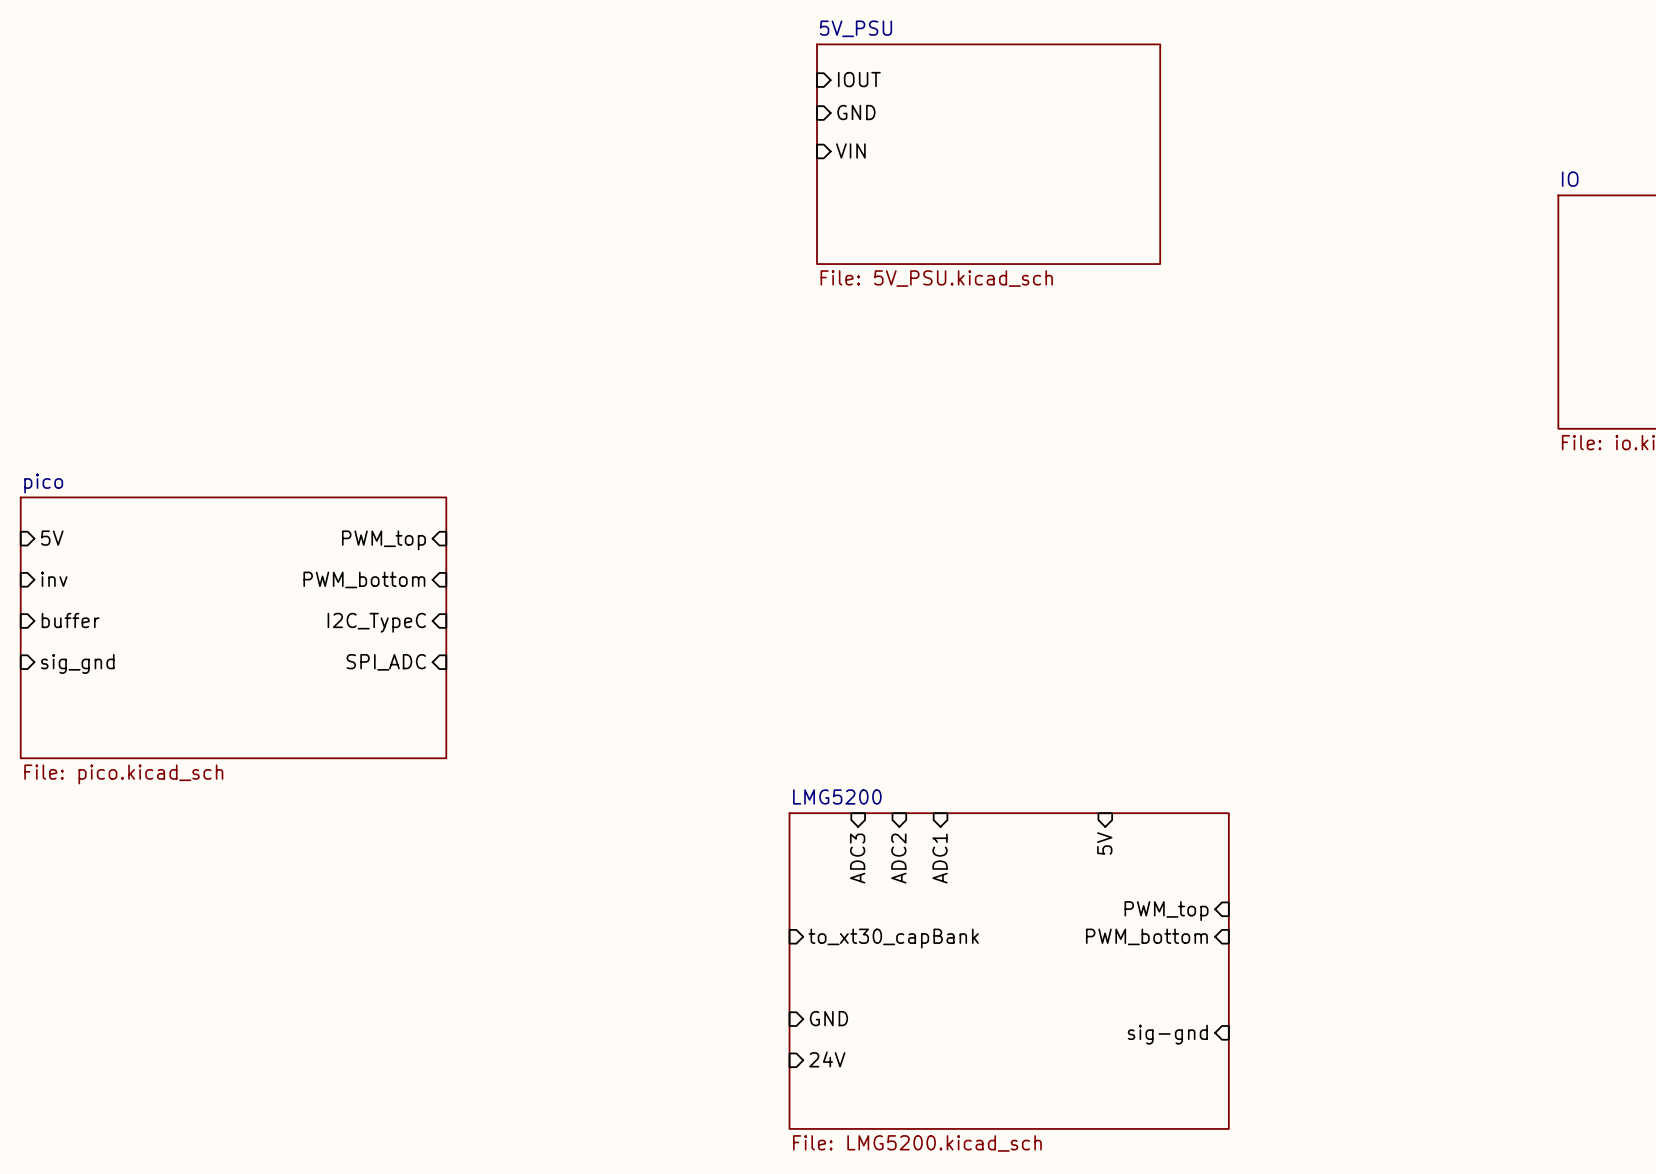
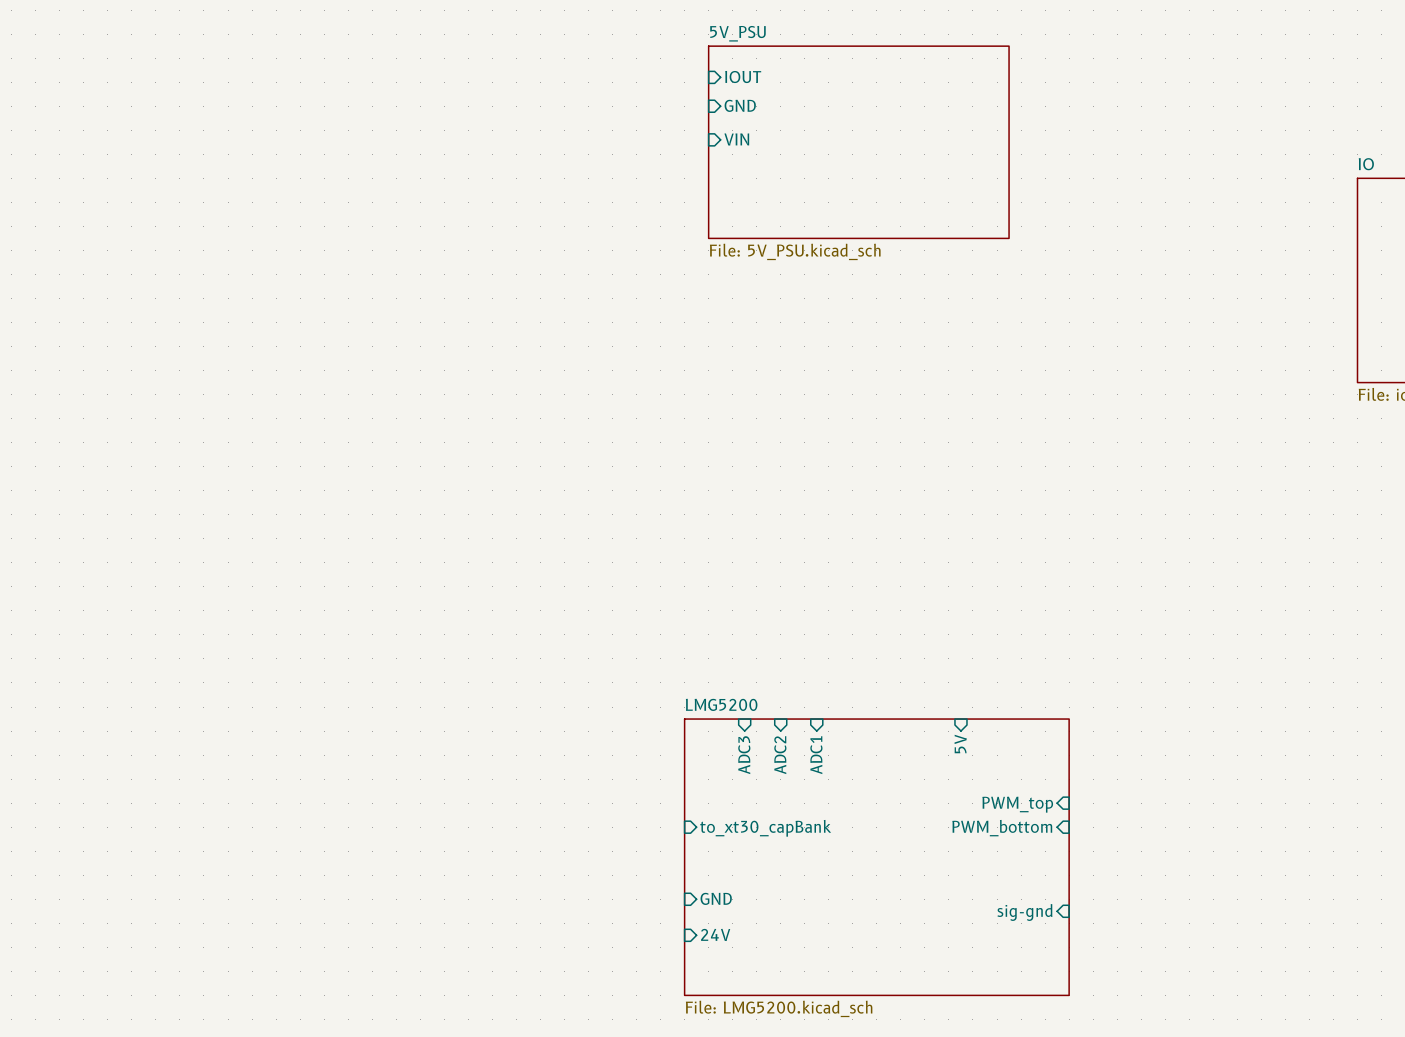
sheet pin: 5V (52, 538) -> none
sheet pin: PWM_top (383, 540) -> none
sheet pin: inv (54, 579) -> none
sheet pin: PWM_bottom (364, 579) -> none
sheet pin: buffer (70, 620) -> none
sheet pin: I2C_TypeC (376, 622) -> none
sheet pico: File: pico.kicad_sch (233, 627) -> none
sheet pin: SPI_ADC (386, 662) -> none
sheet pin: sig_gnd (77, 663) -> none

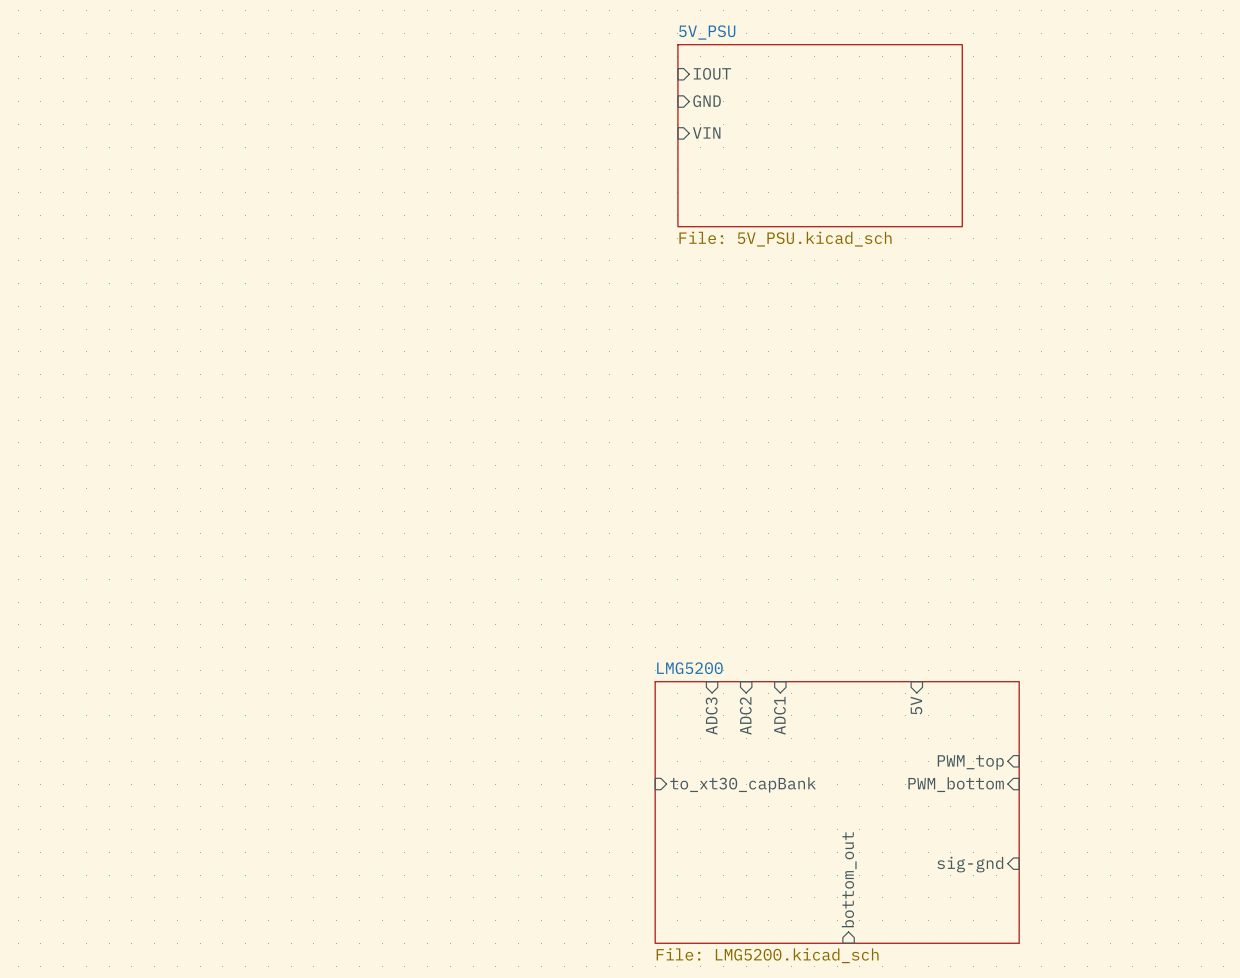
sheet pin: GND (716, 898) -> none
sheet pin: 24V (715, 934) -> none
sheet pin: none -> bottom_out (849, 879)

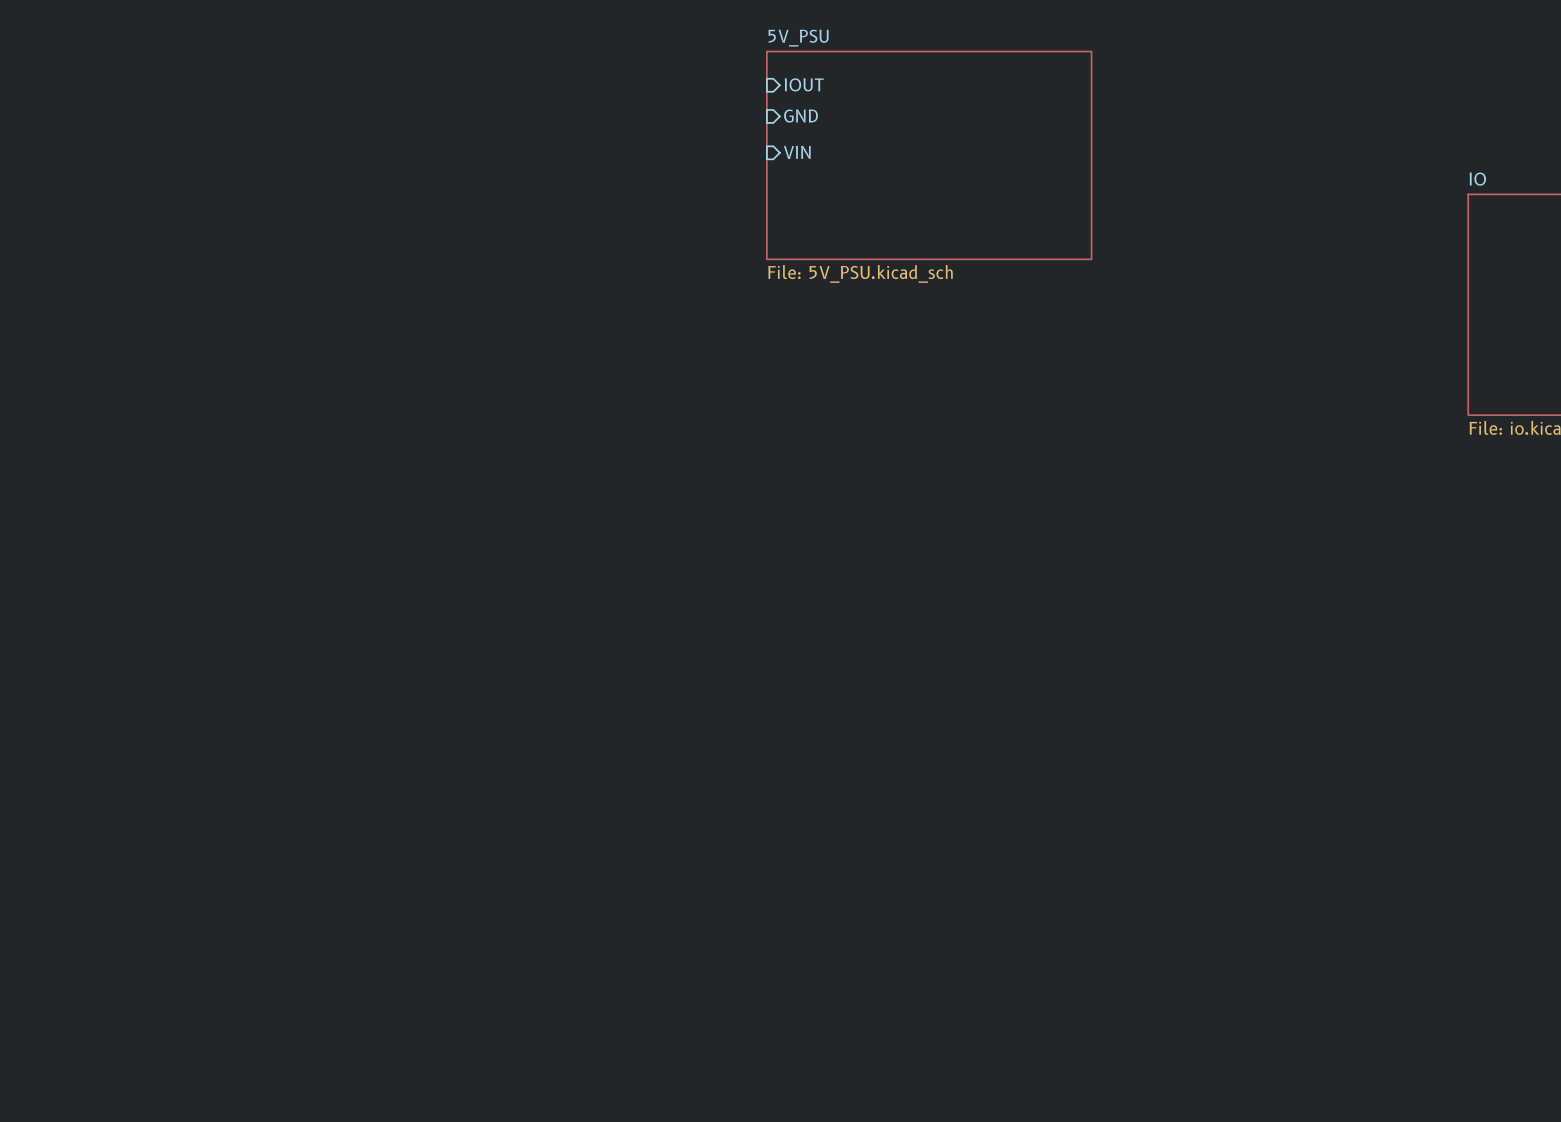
sheet pin: 5V (916, 705) -> none
sheet pin: ADC2 (745, 715) -> none
sheet pin: ADC1 (779, 715) -> none
sheet pin: ADC3 (711, 716) -> none
sheet pin: PWM_top (970, 762) -> none
sheet pin: to_xt30_capBank (743, 784) -> none
sheet pin: PWM_bottom (956, 784) -> none
sheet LMG5200: File: LMG5200.kicad_sch (837, 812) -> none
sheet pin: sig-gnd (970, 864) -> none
sheet pin: bottom_out (849, 879) -> none

